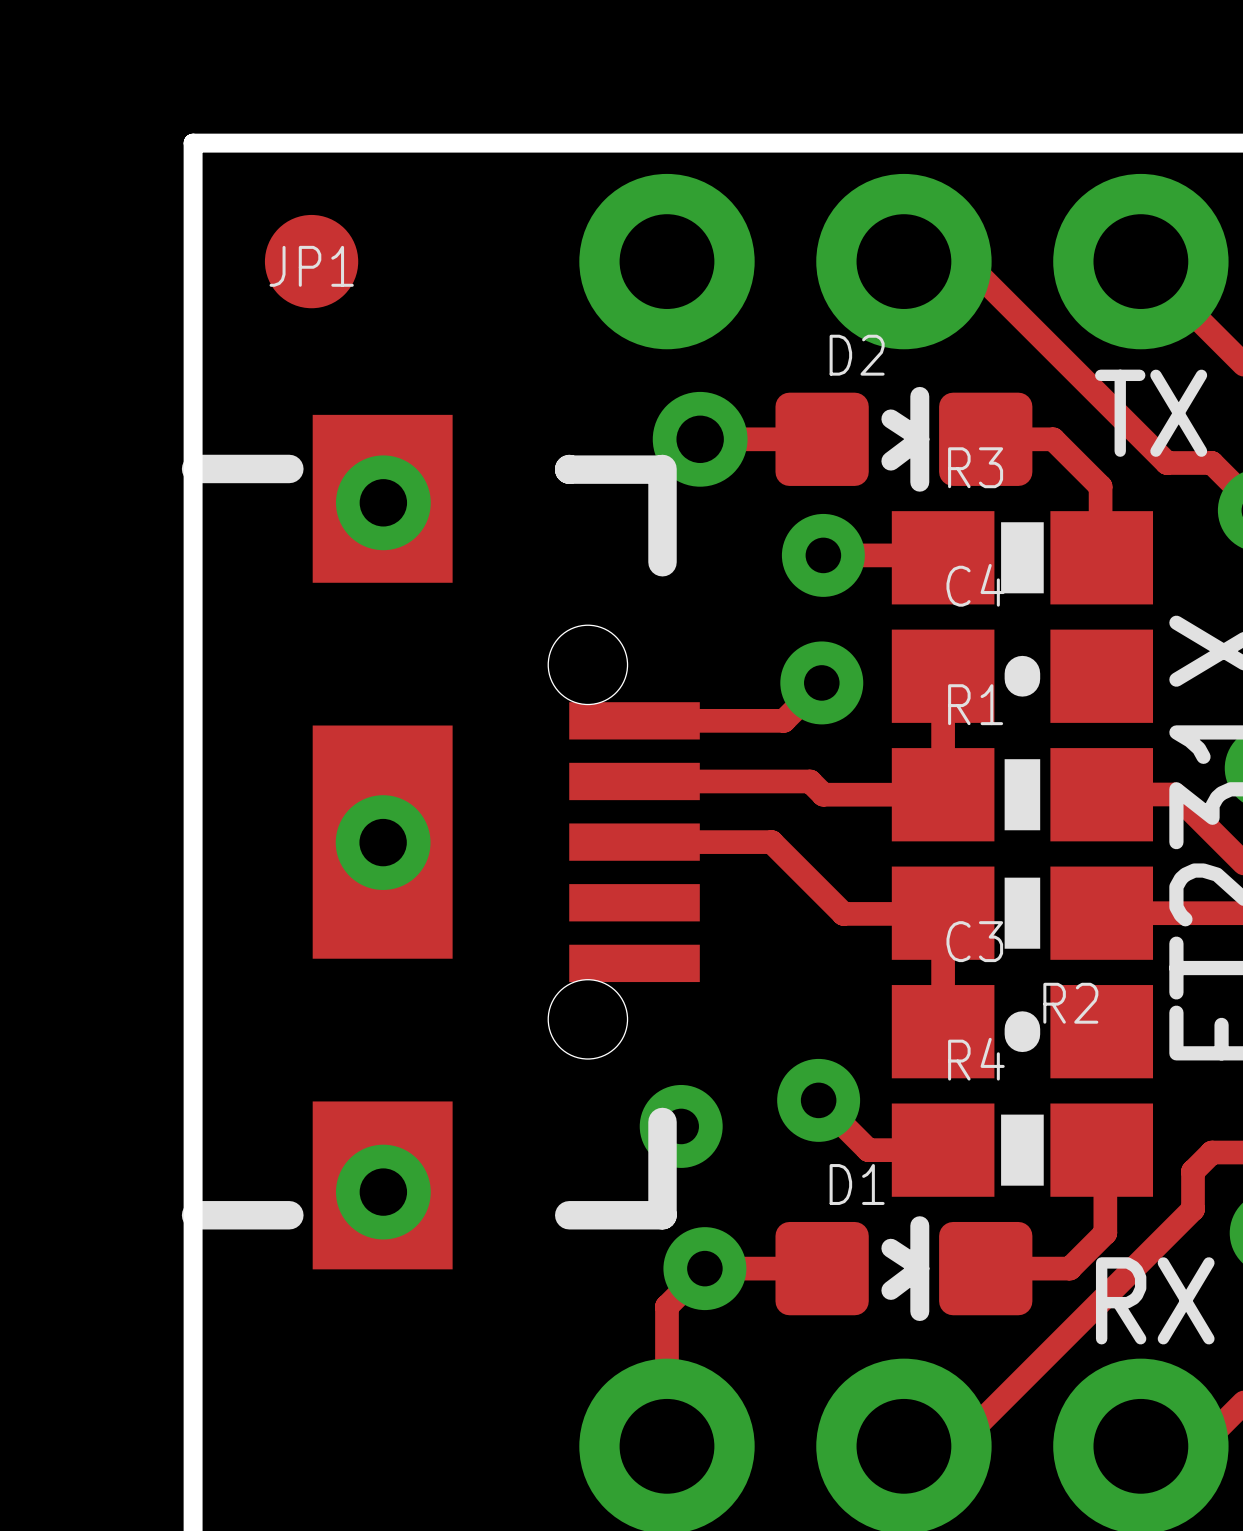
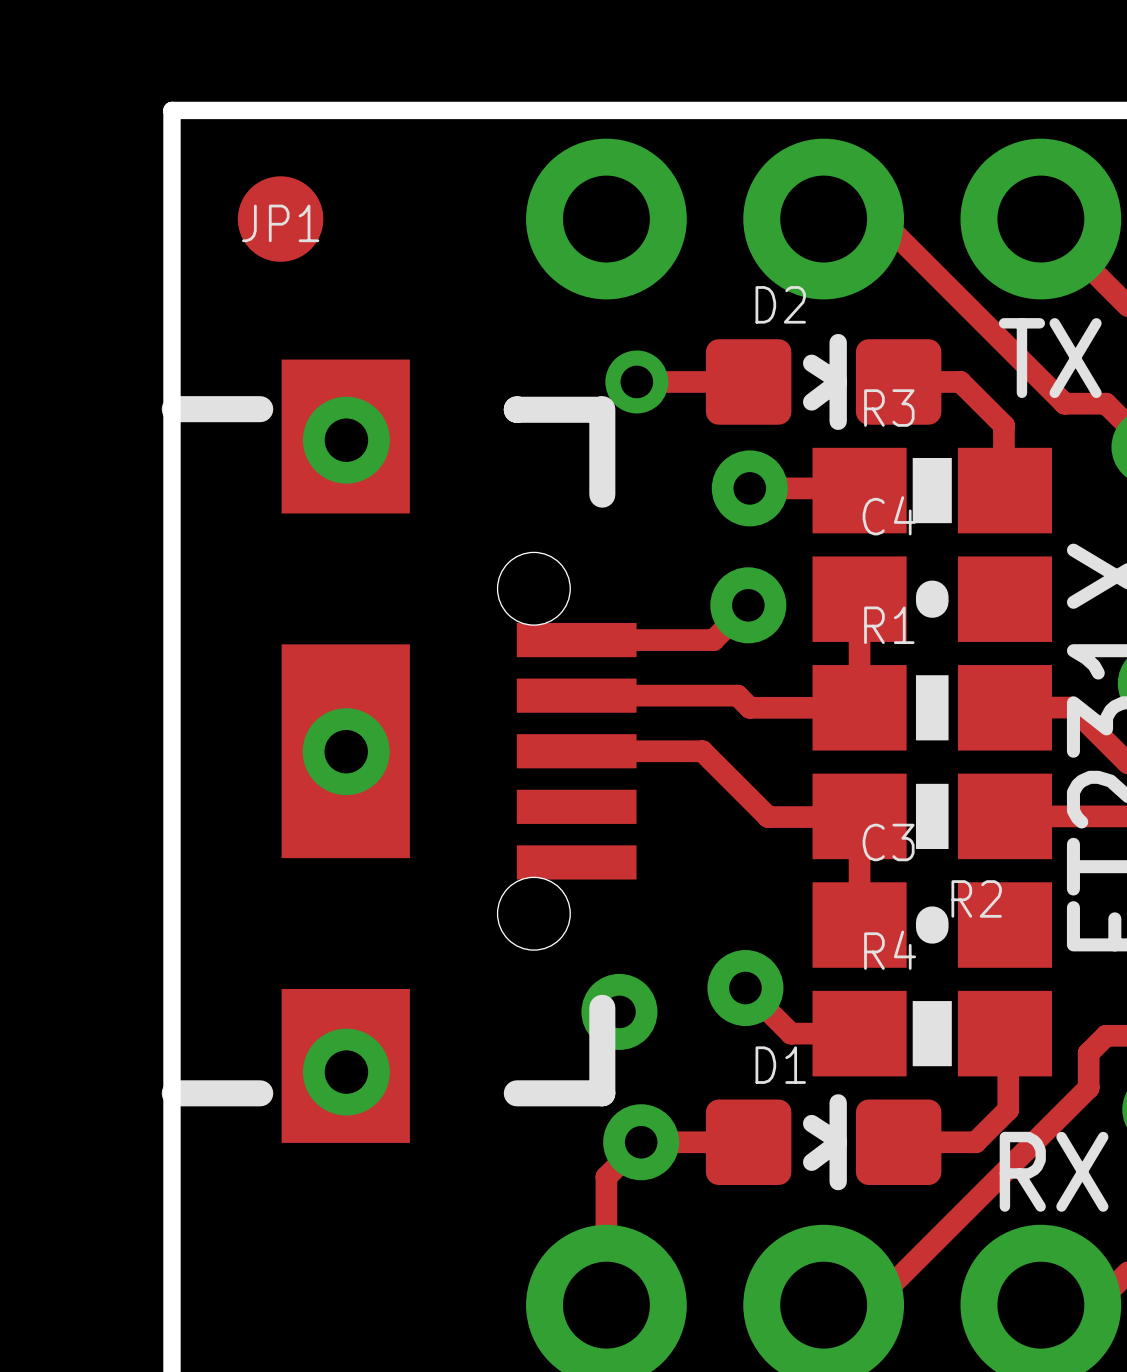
via size: [652, 391, 748, 487] -> [605, 350, 669, 414]

